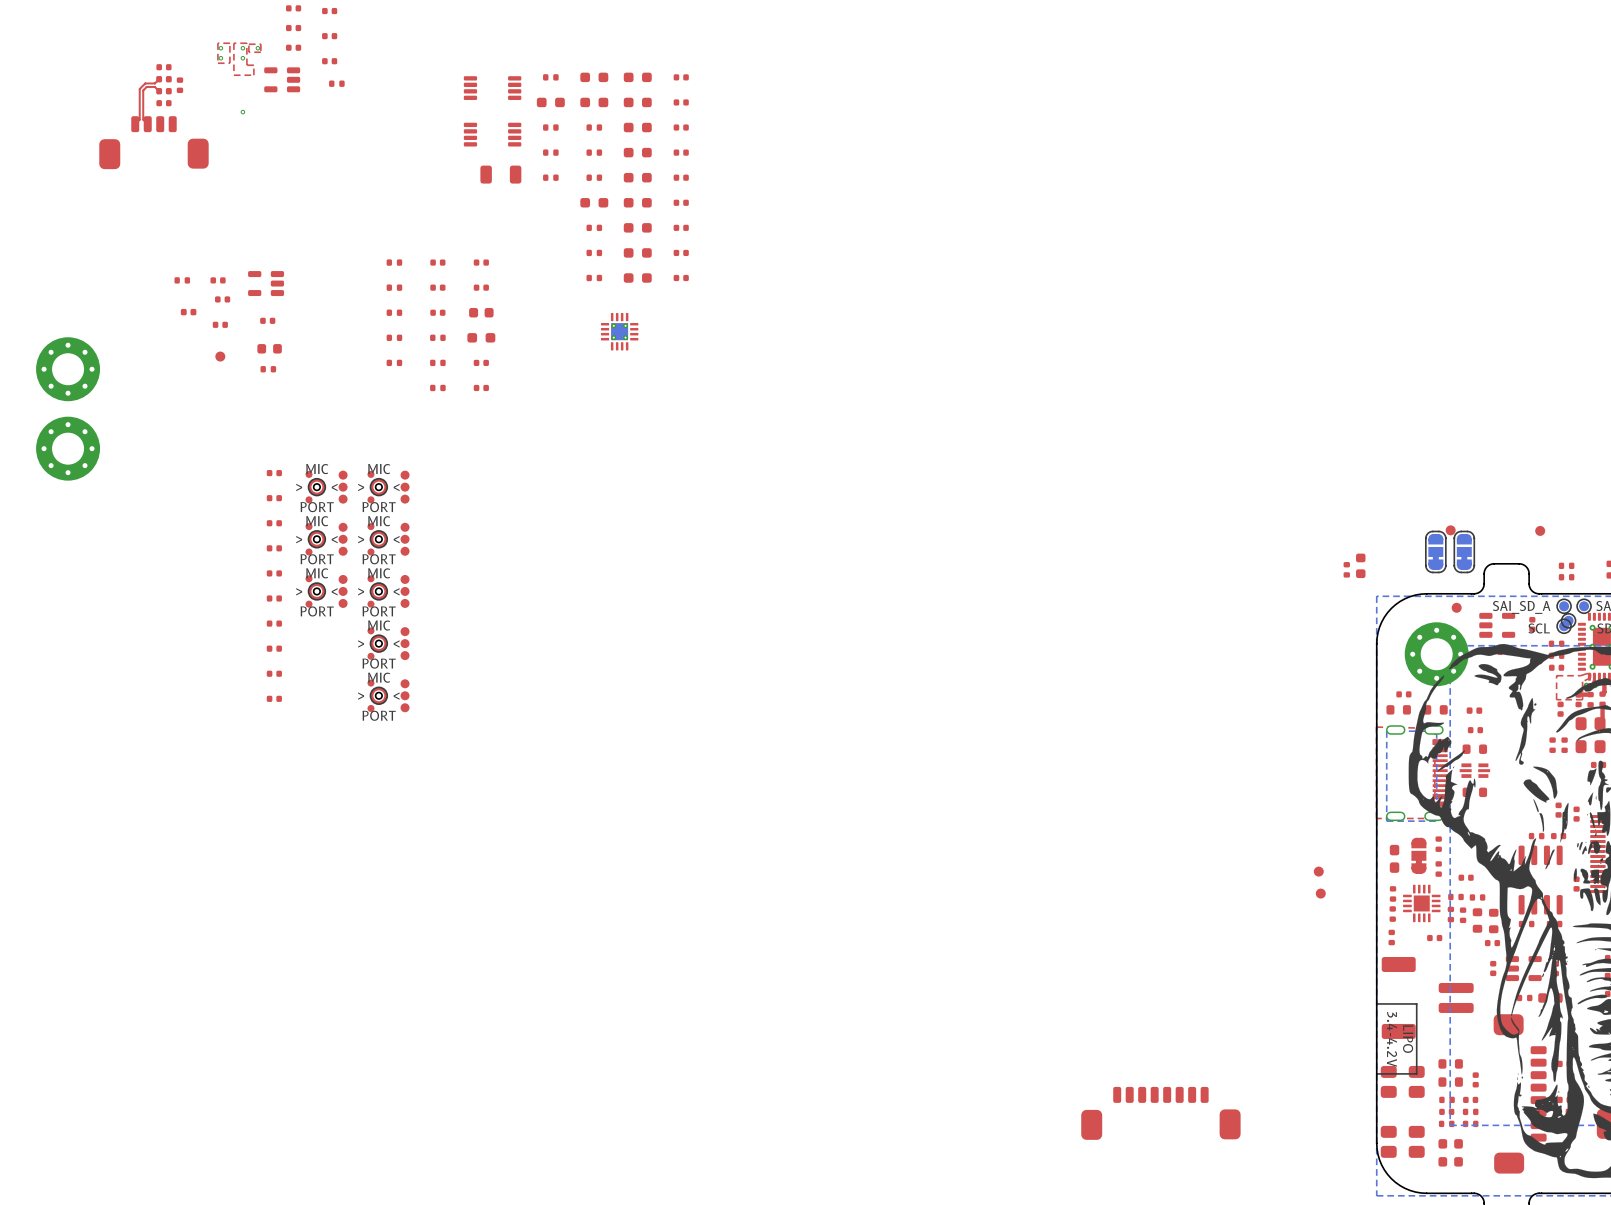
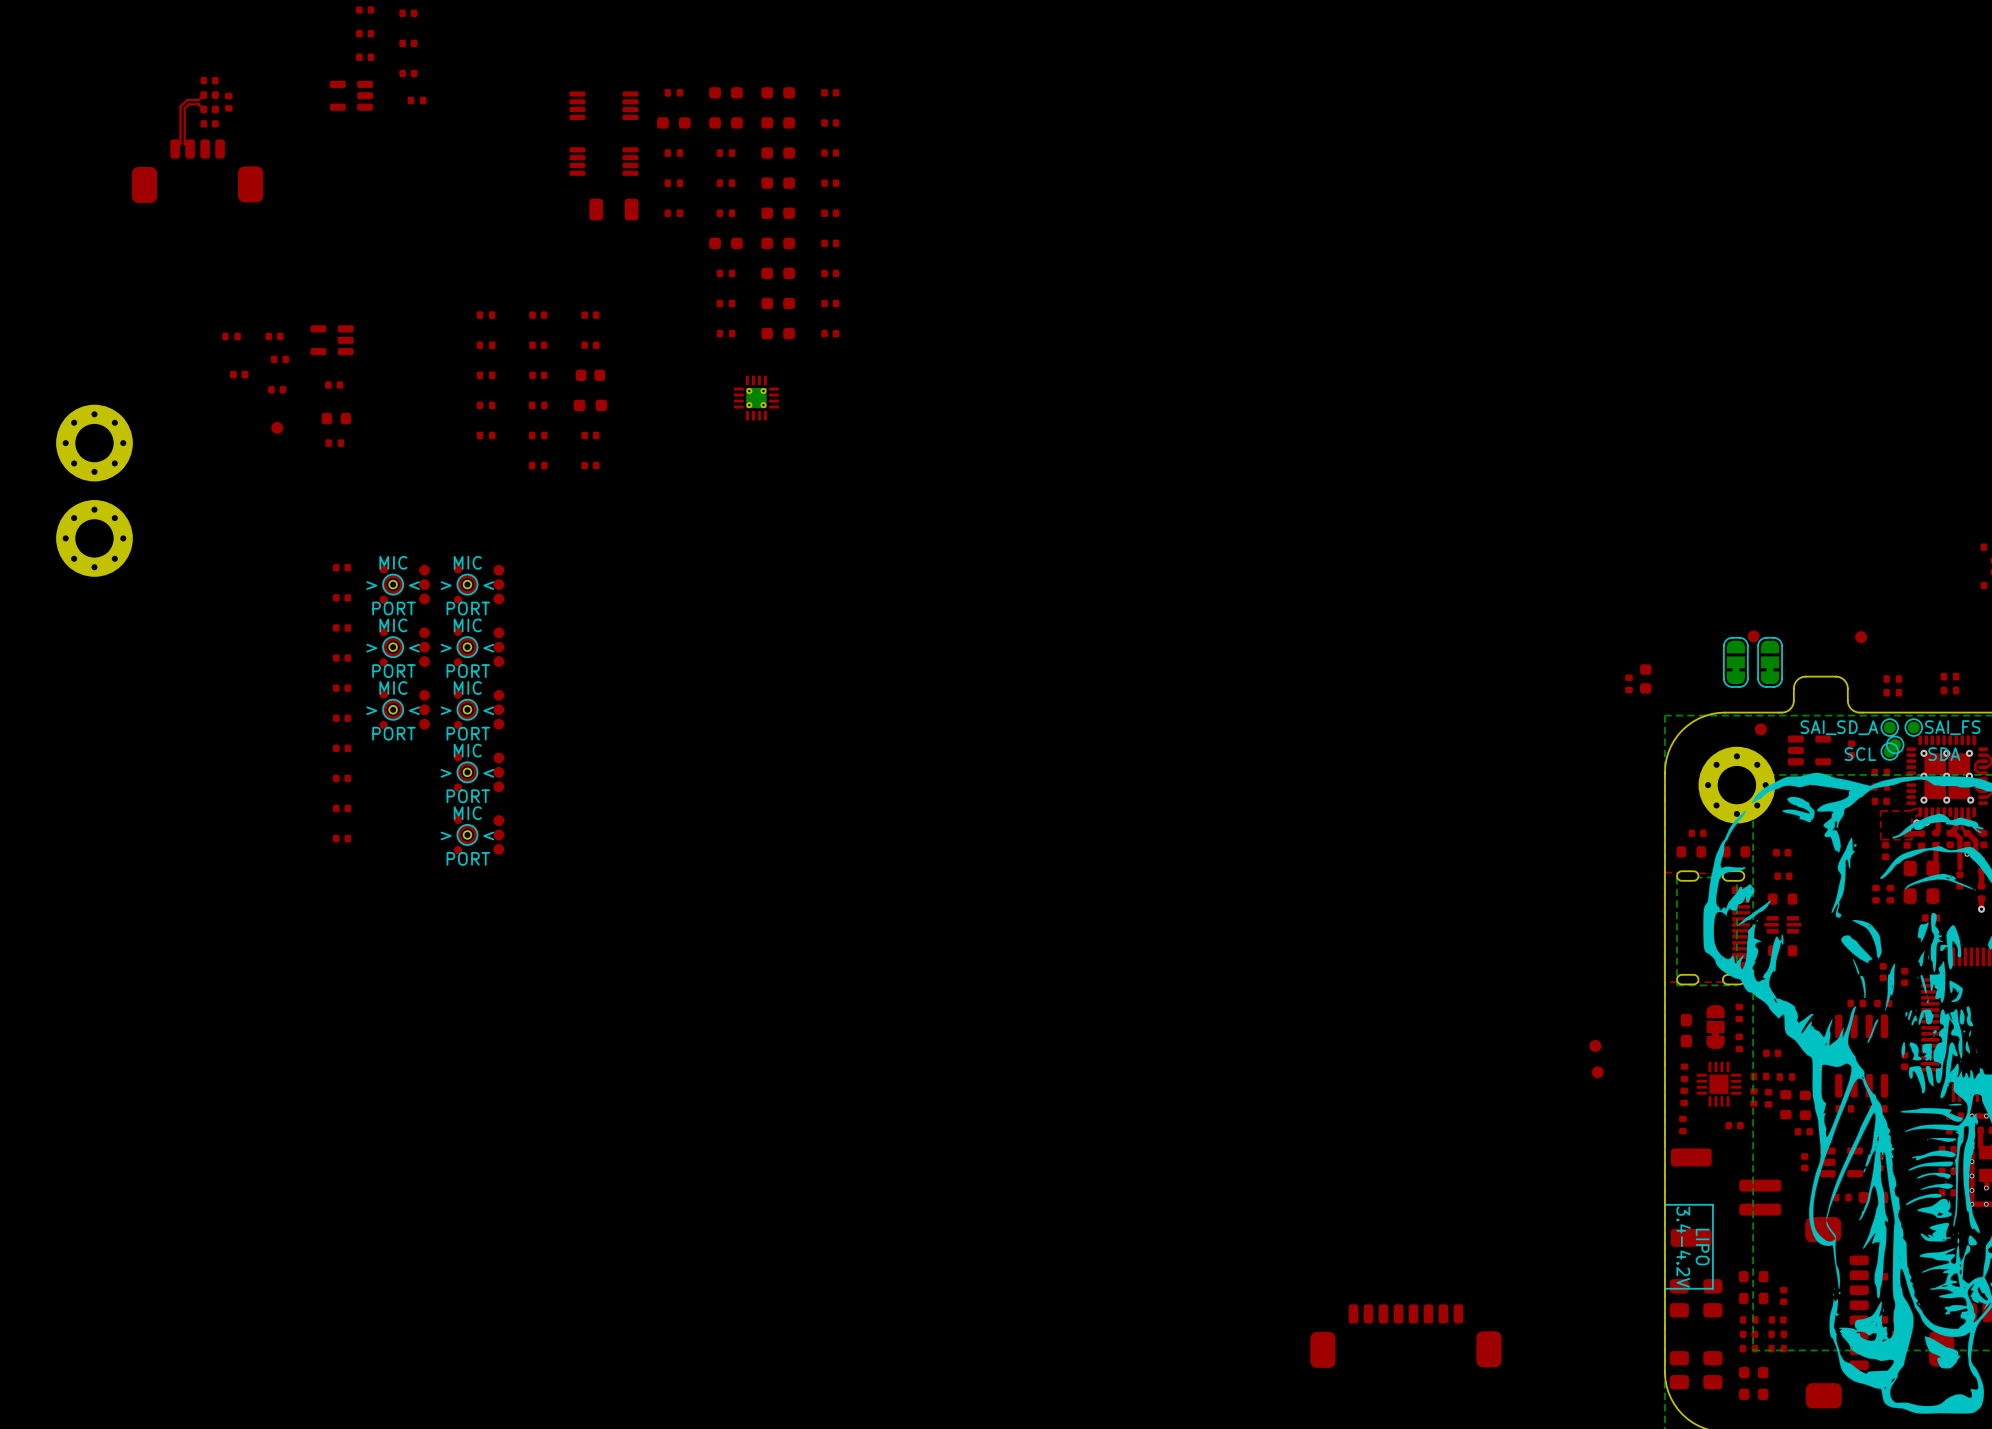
top zone outline: (229, 43) (217, 43) (217, 63) (229, 63) (229, 43) -> none
top zone outline: (246, 43) (246, 65) (253, 65) (253, 75) (233, 75) (233, 43) (246, 43) -> none
top zone outline: (260, 44) (248, 44) (248, 52) (260, 52) (260, 44) -> none
via: (220, 48) -> none
via: (242, 48) -> none
via: (257, 48) -> none
via: (220, 58) -> none
via: (242, 58) -> none
via: (242, 112) -> none

